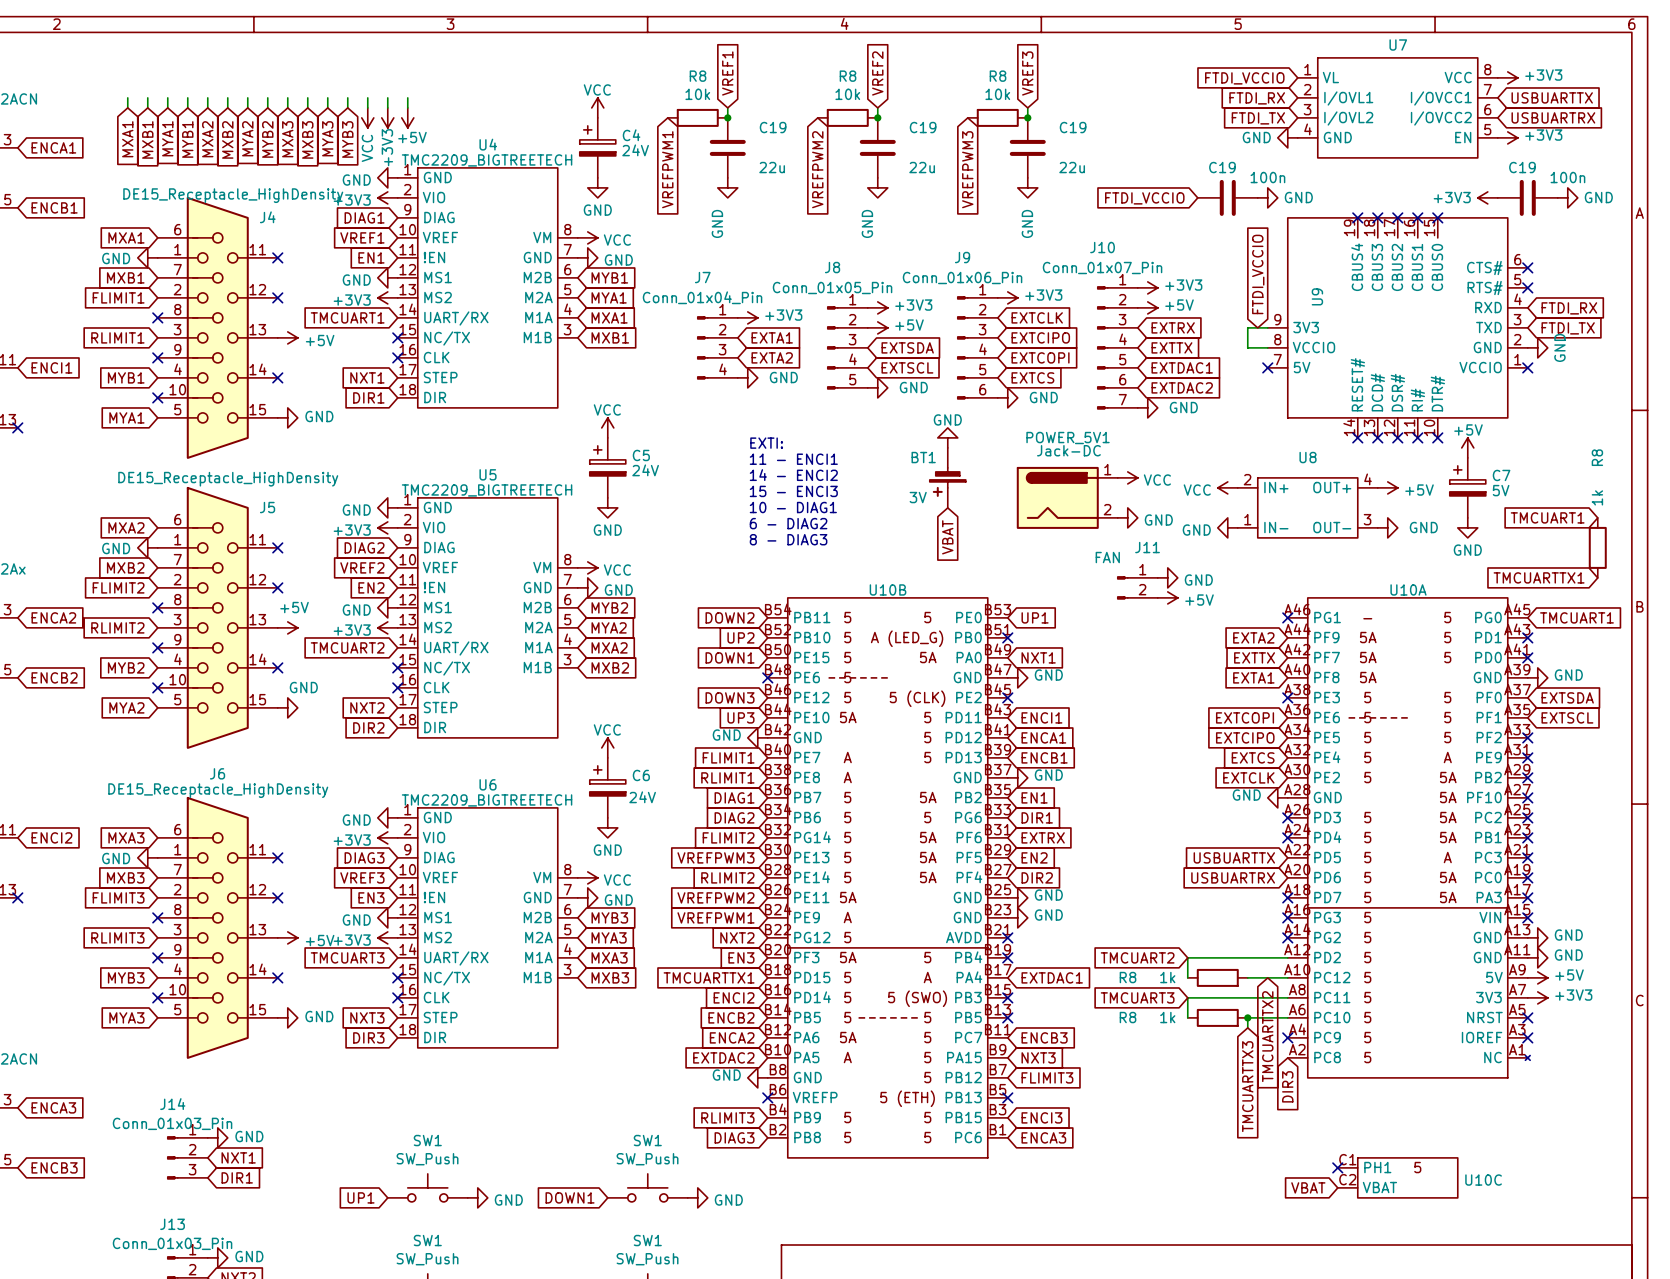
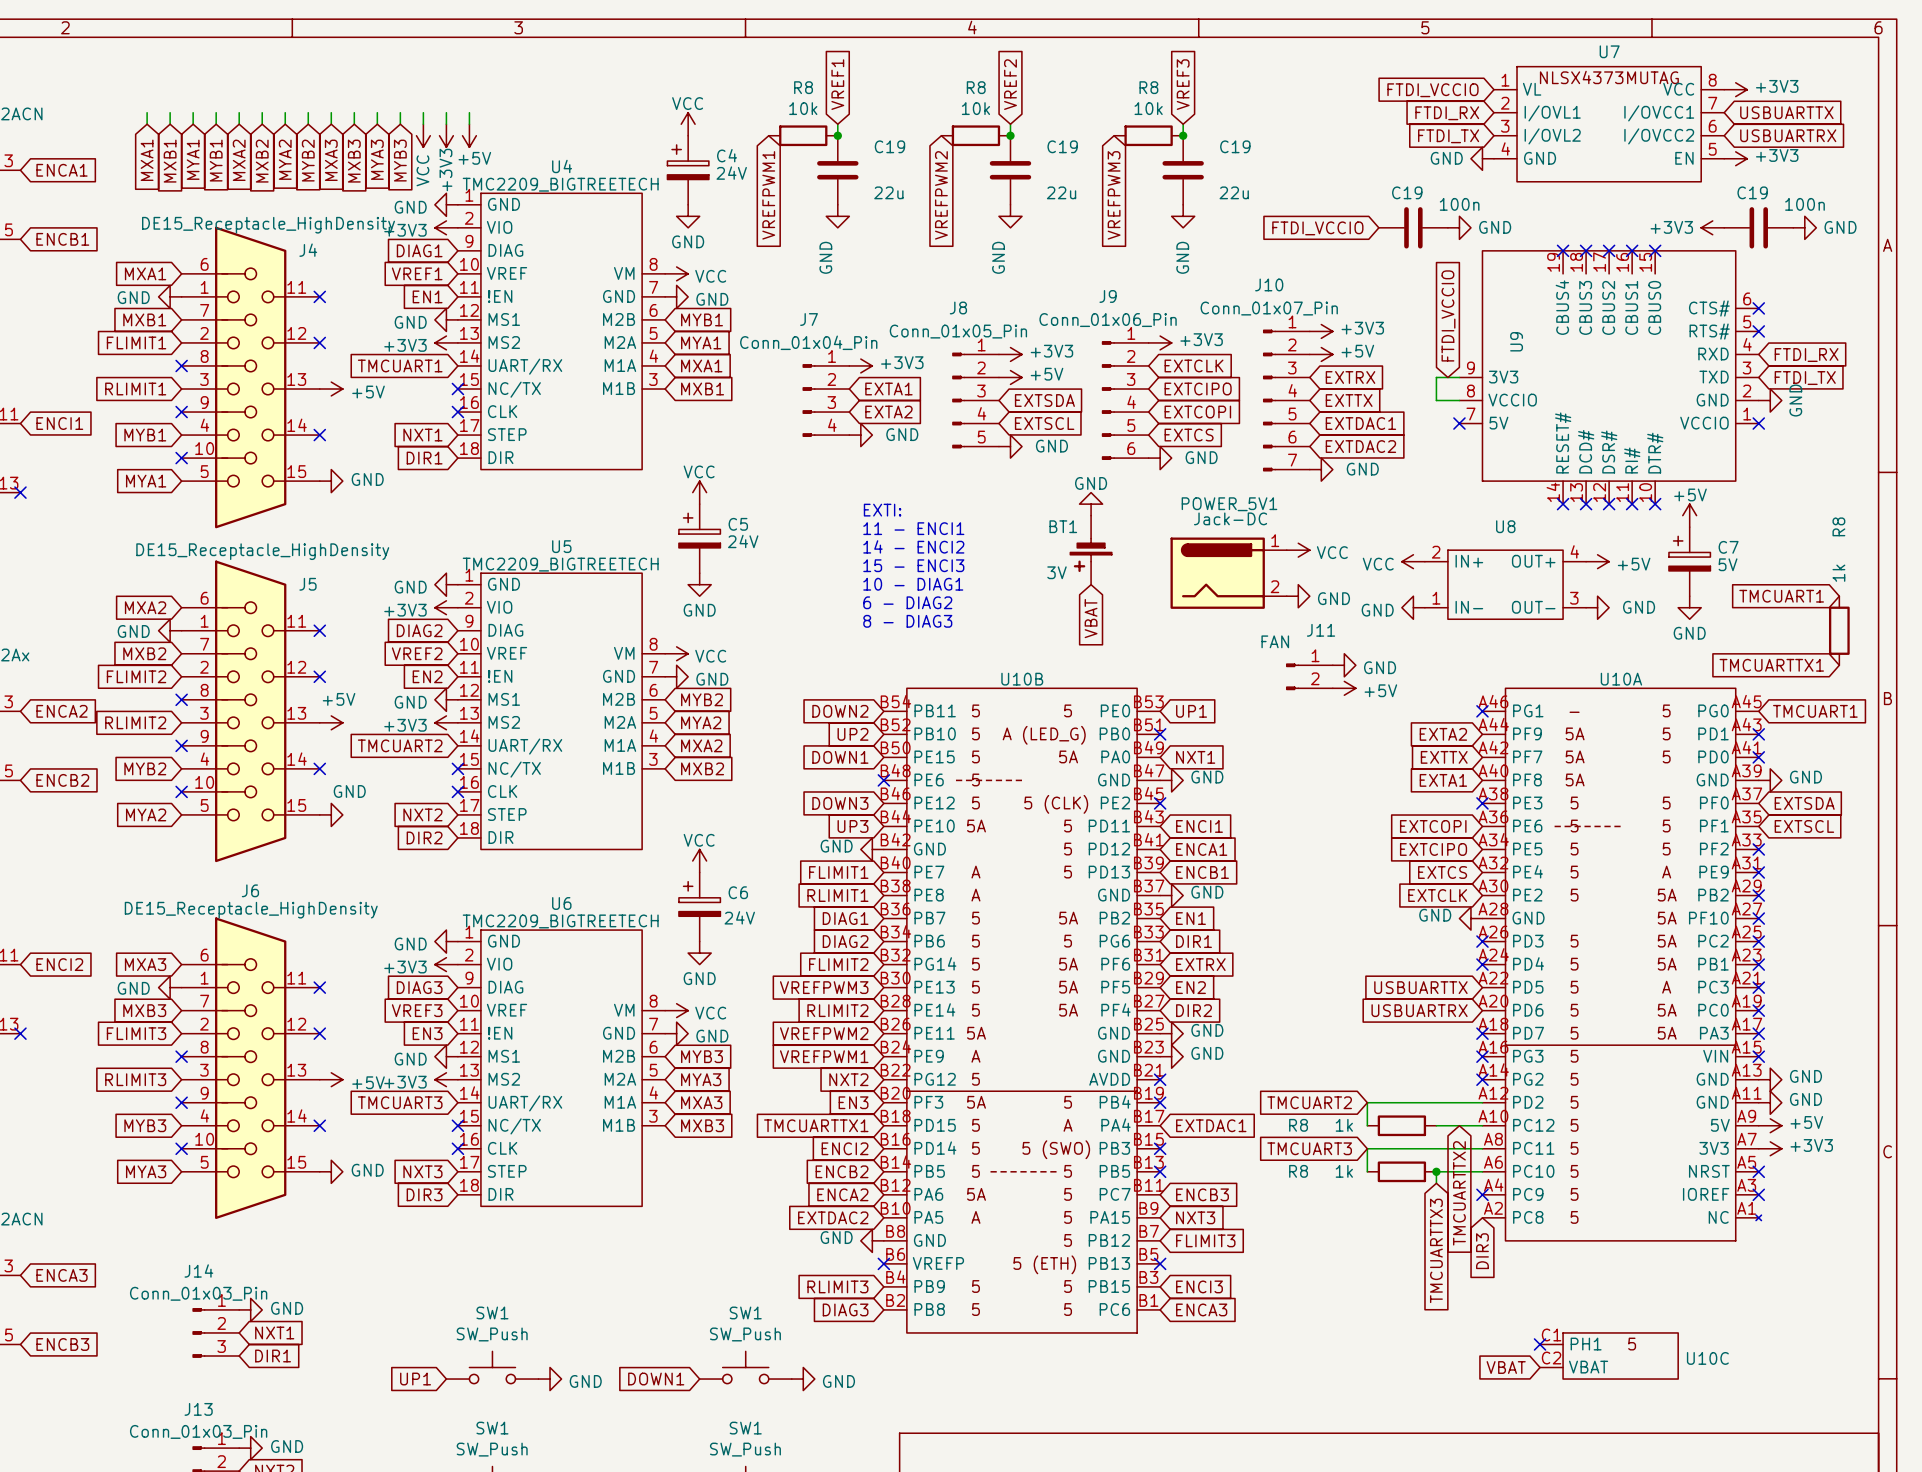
U7 text: none -> NLSX4373MUTAG (1609, 77)

